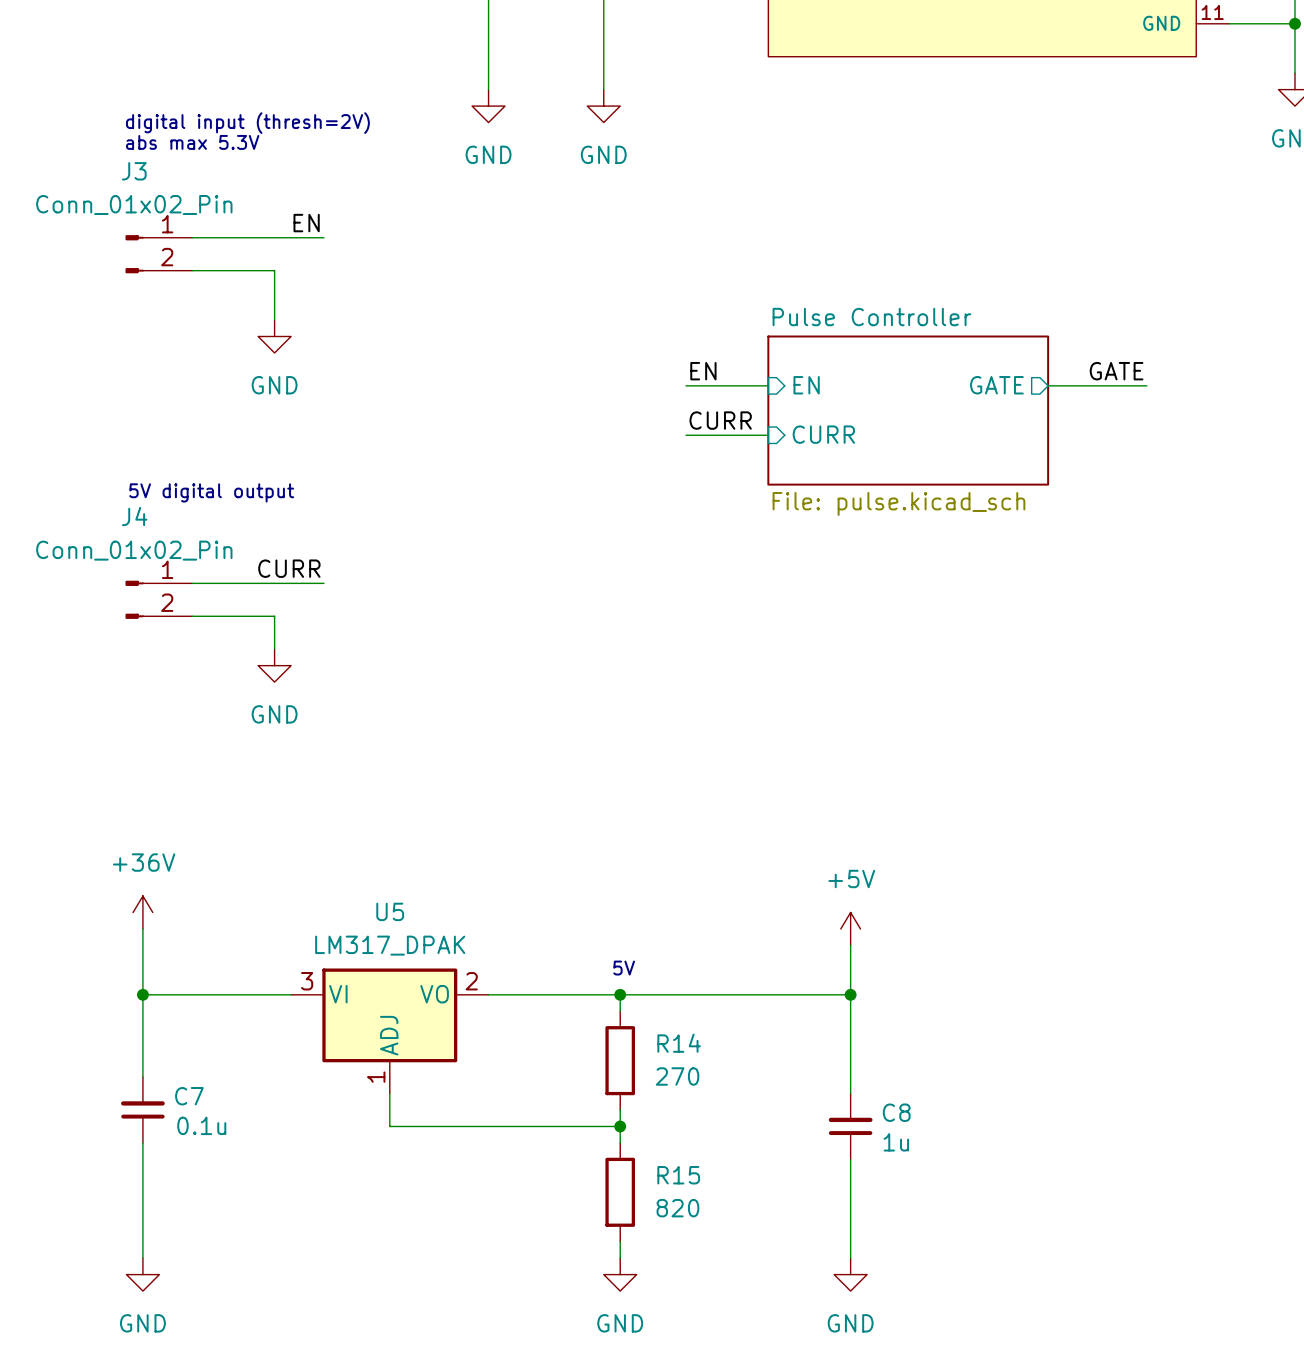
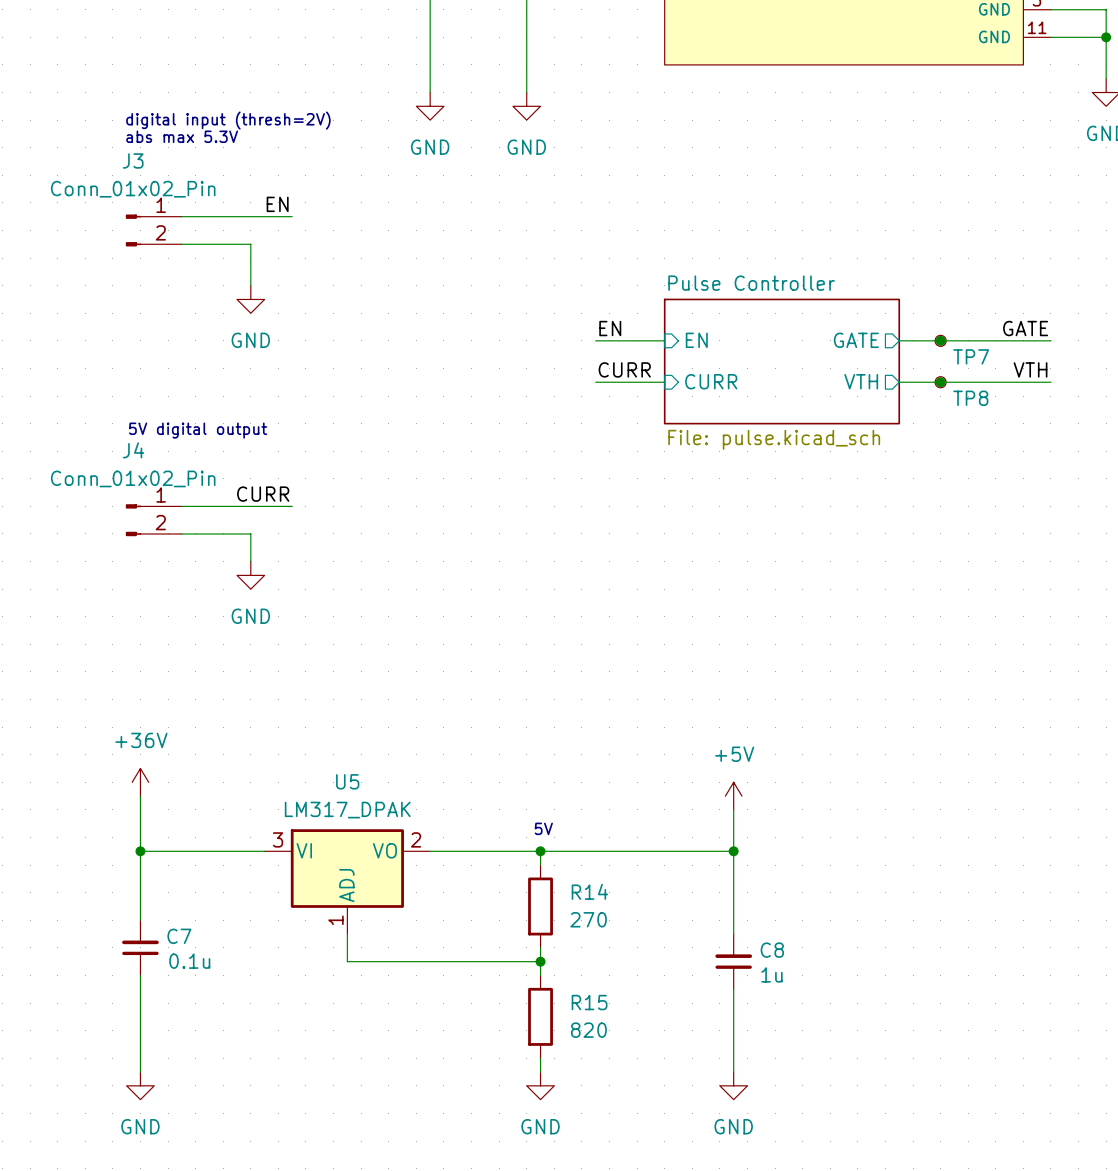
label position: GATE (1116, 371) -> GATE (1025, 328)
junction: none -> (940, 340)
TP7: none -> (940, 340)
wire: none -> (982, 340) (1050, 340)
label: none -> VTH (1030, 369)
sheet pin: none -> VTH (861, 381)
wire: none -> (899, 382) (1050, 382)
junction: none -> (940, 382)
TP8: none -> (940, 382)

